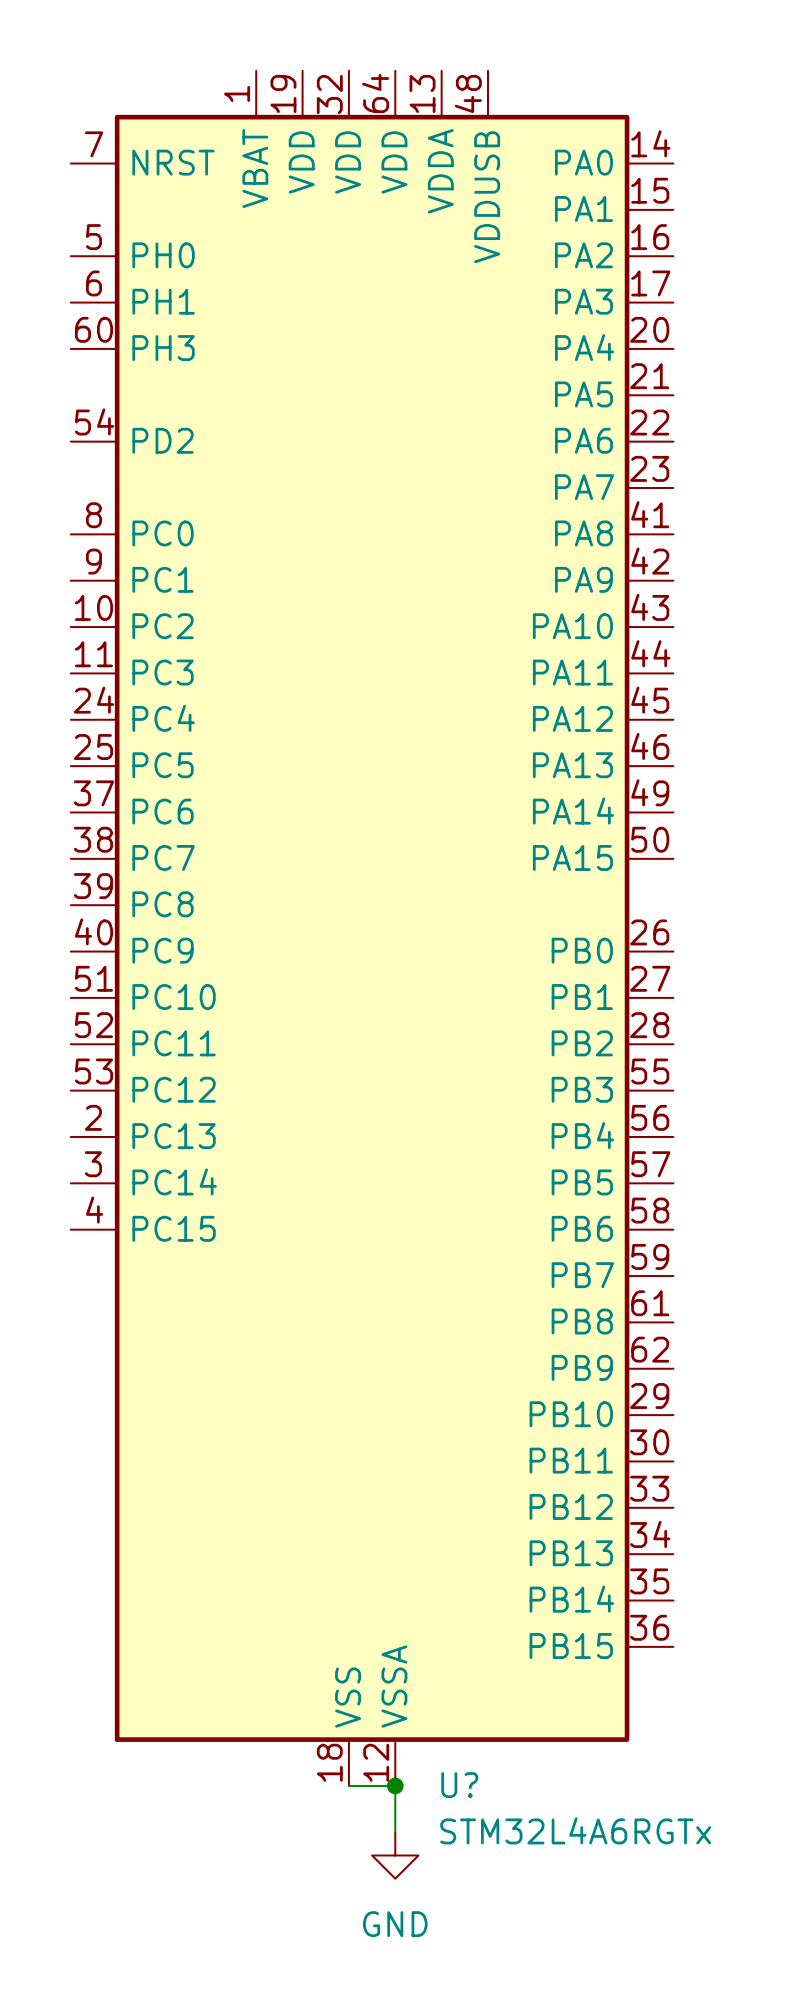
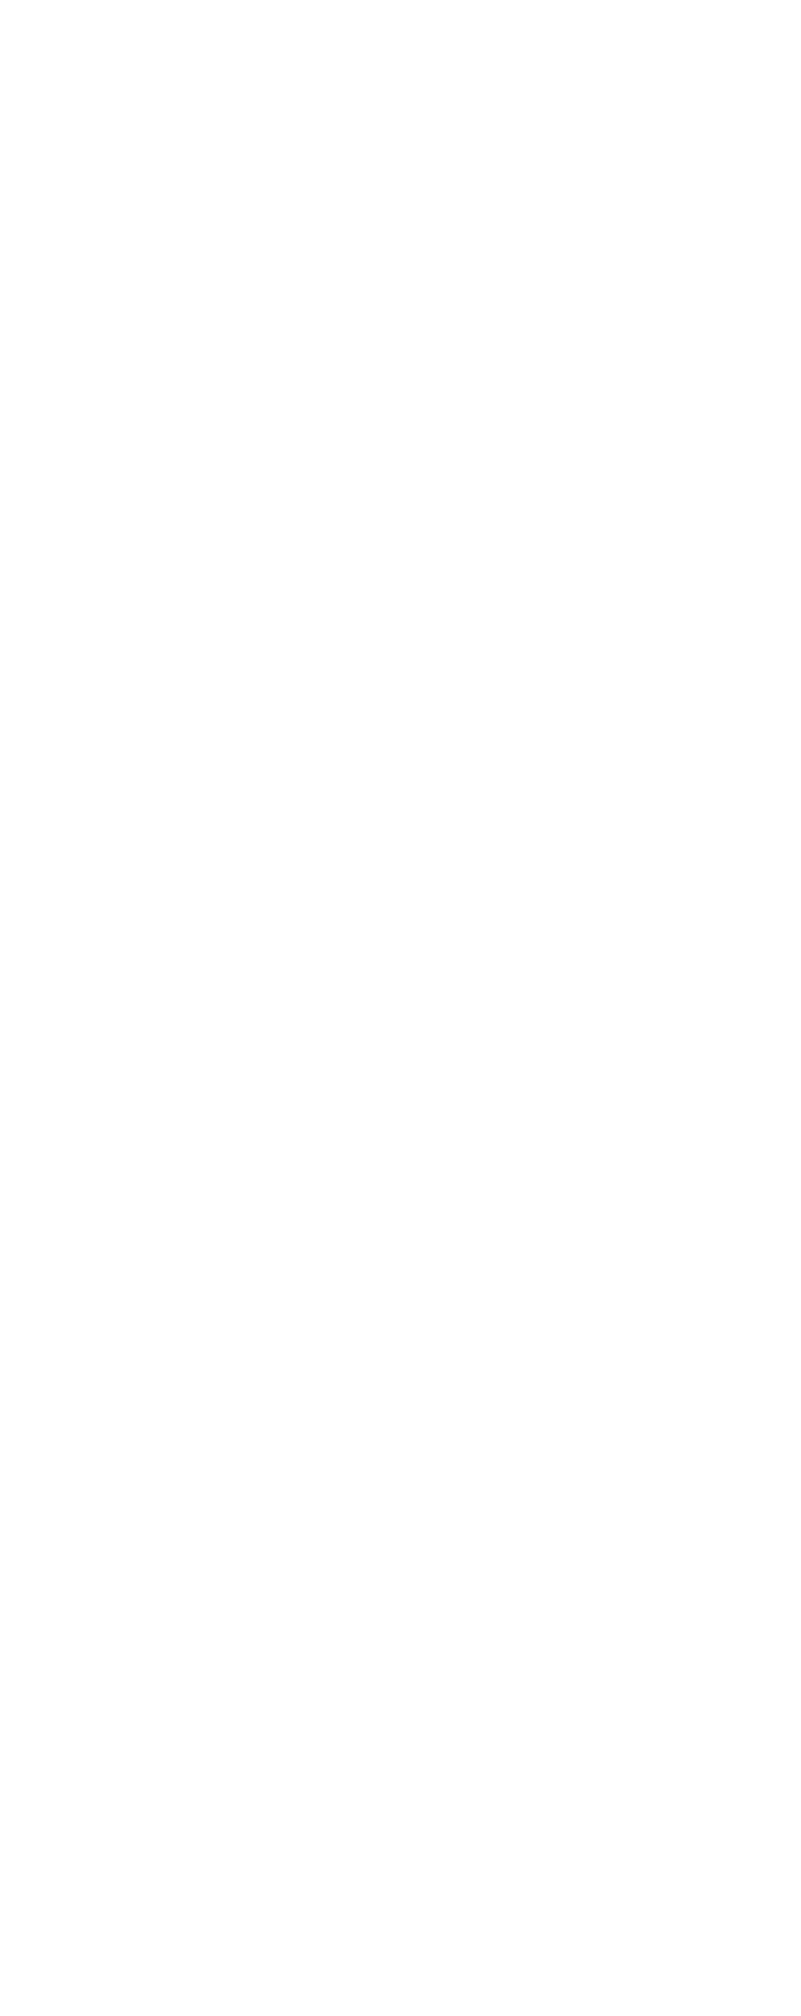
U?: STM32L4A6RGTx (372, 928) -> none
wire: (348, 1785) (395, 1785) (395, 1832) -> none
junction: (395, 1785) -> none
power symbol: GND (395, 1855) -> none

